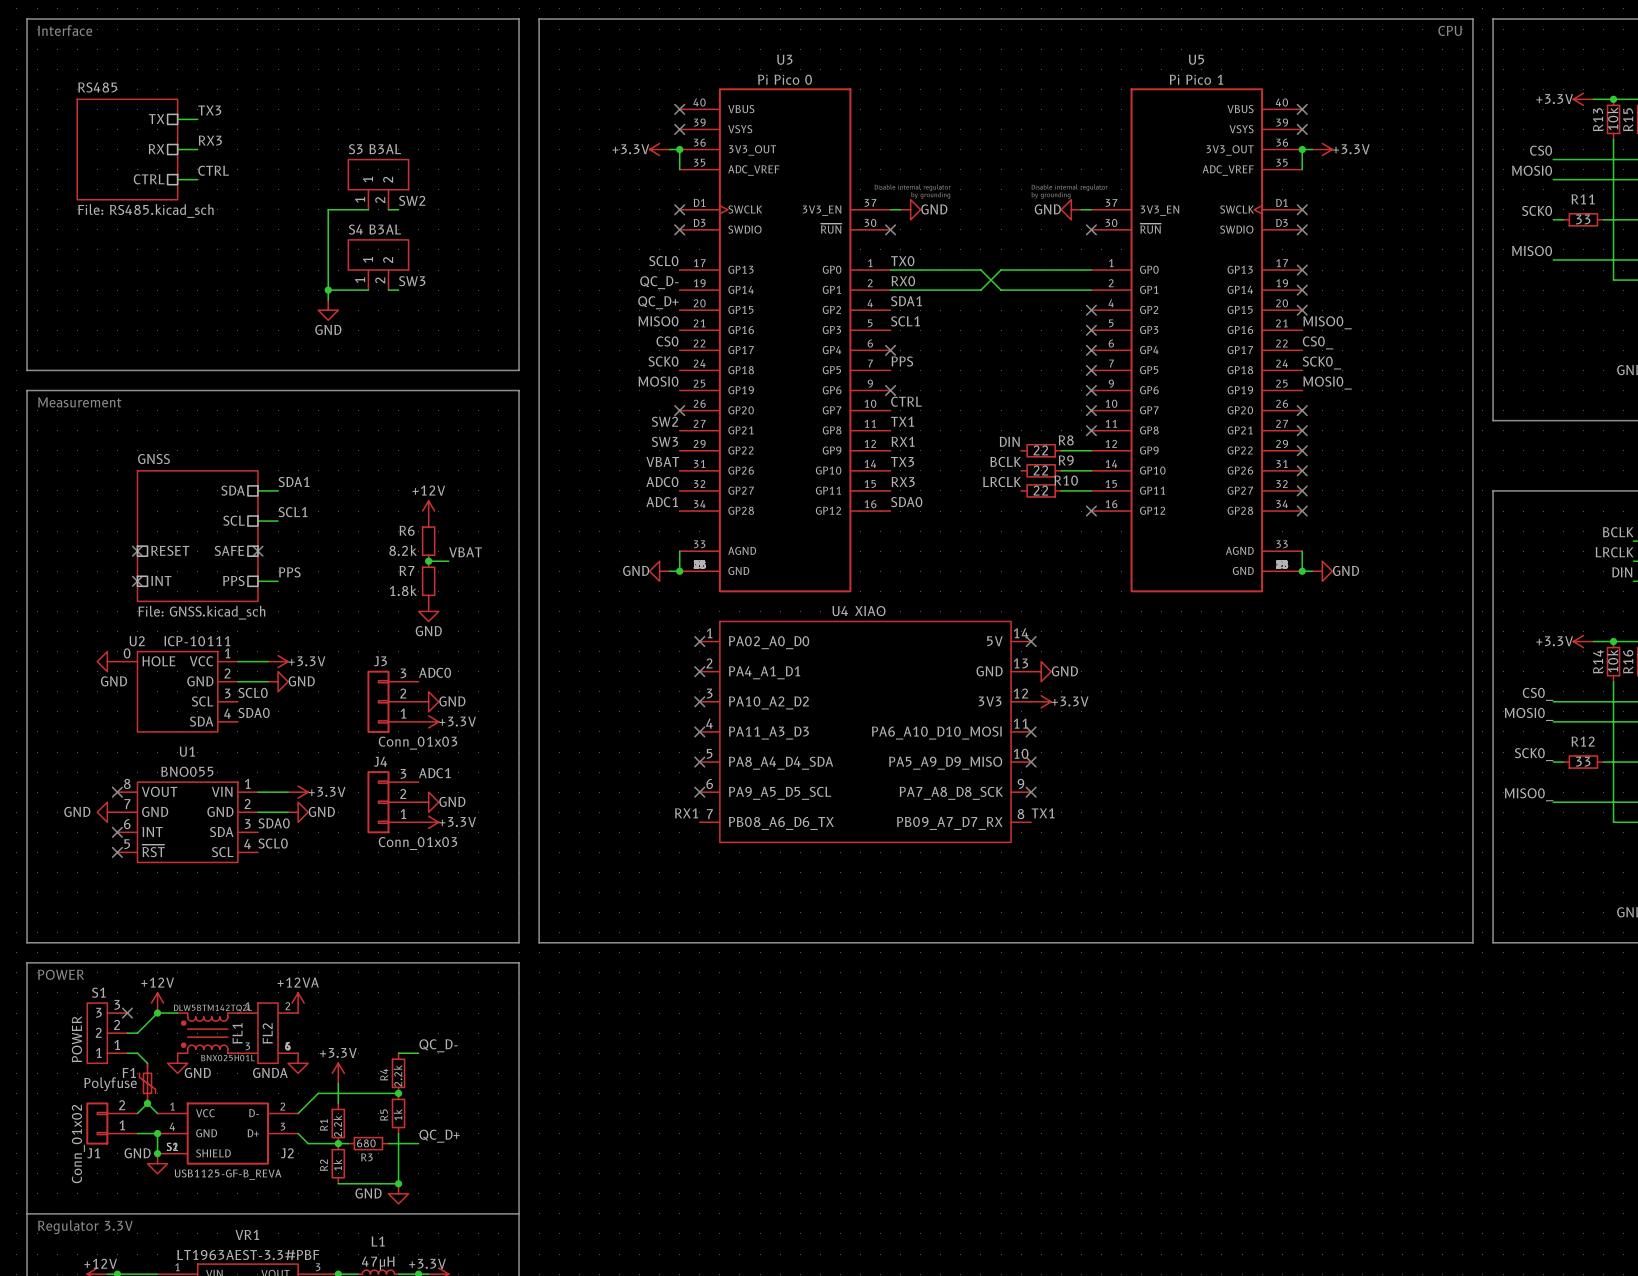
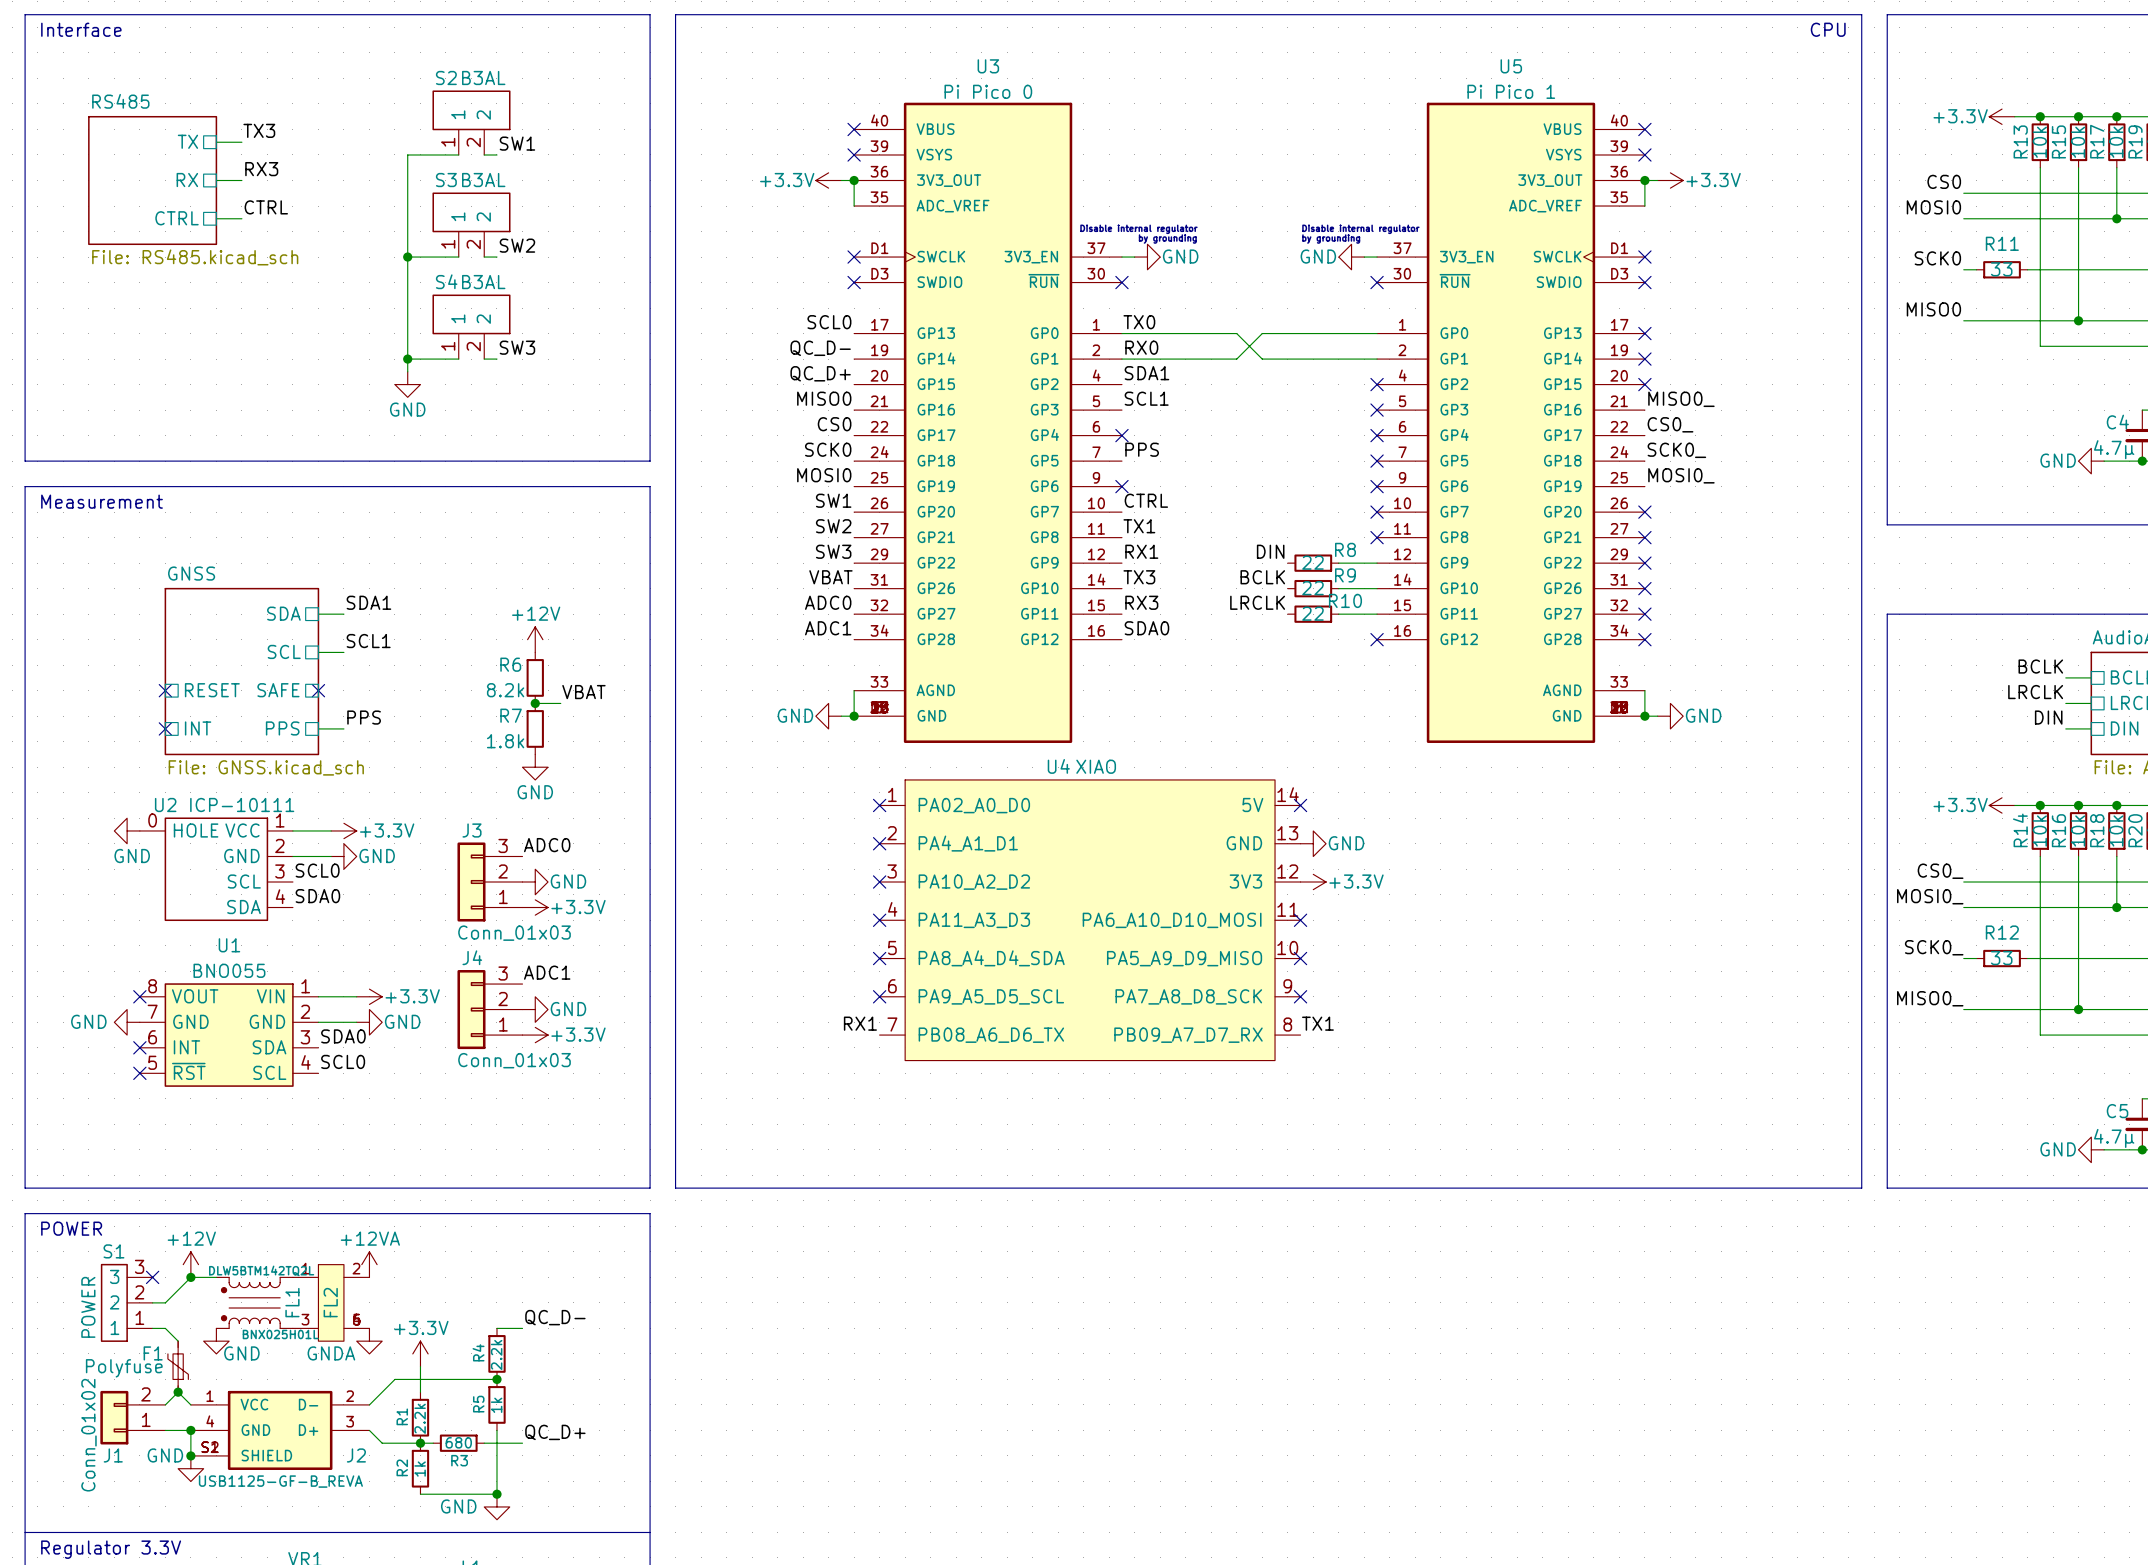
S2: none -> B3AL (471, 122)
label: none -> SW1 (517, 143)
wire: none -> (458, 154) (407, 154) (407, 257)
wire: none -> (484, 154) (496, 154)
junction: none -> (407, 257)
label: none -> SW1 (833, 500)
no-connect mark: (679, 410) -> none

